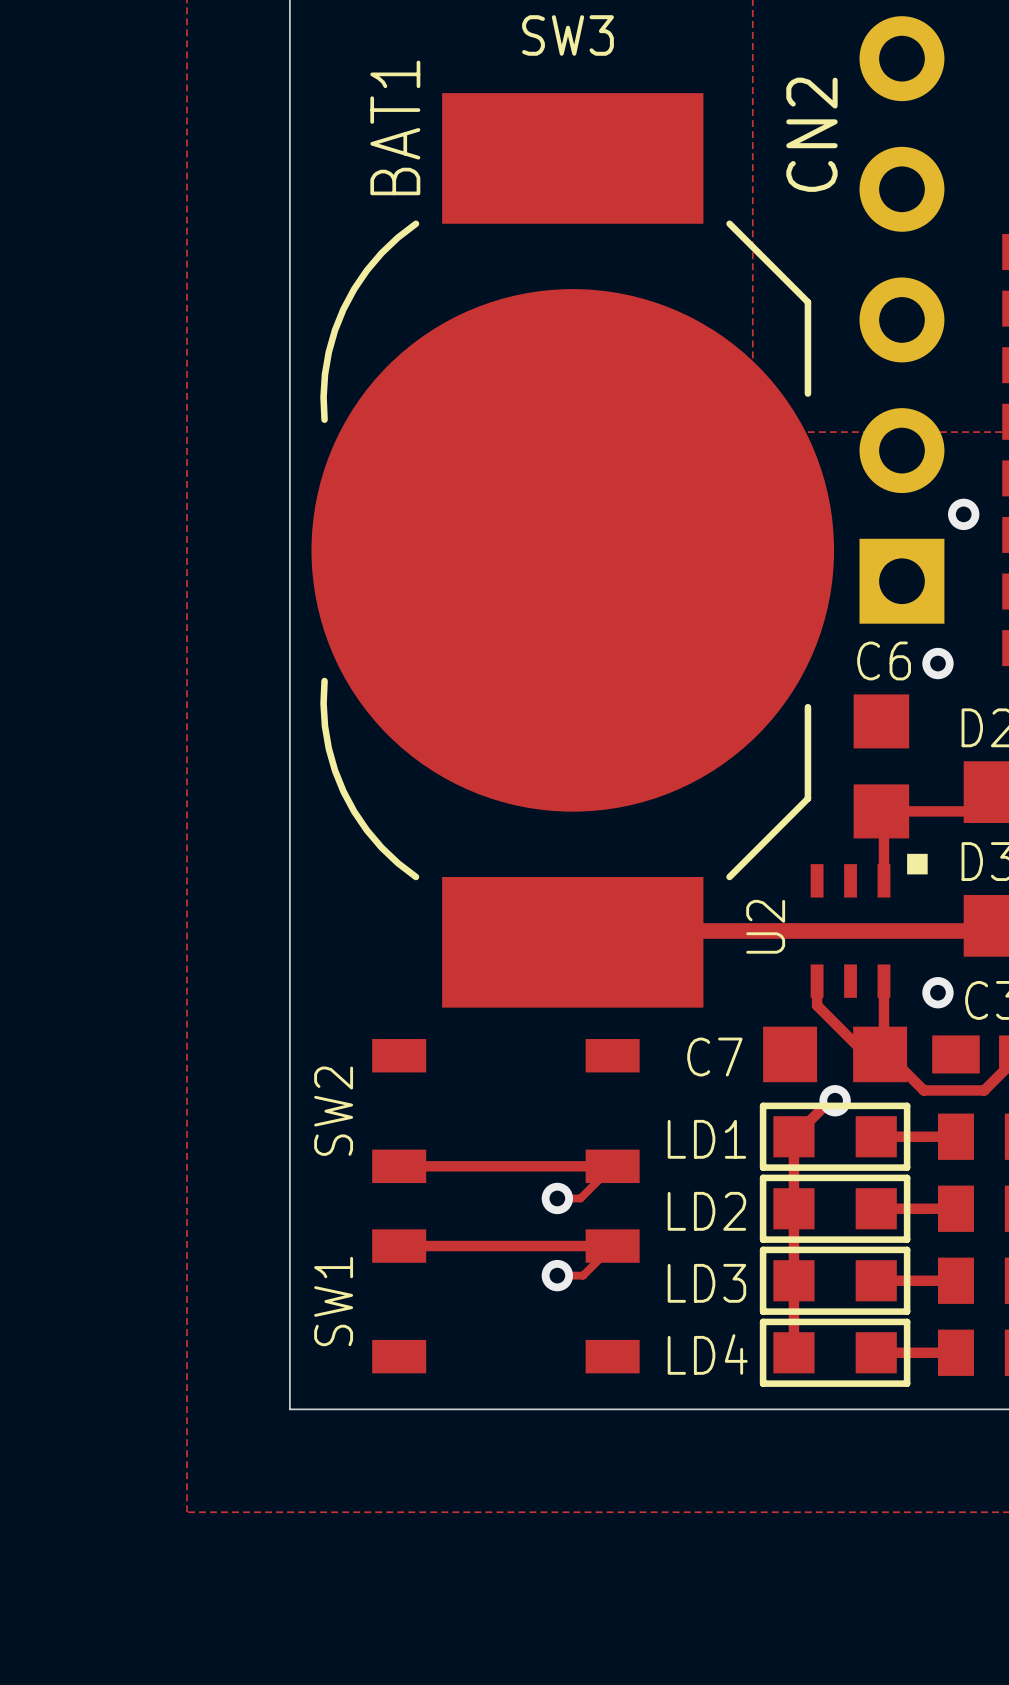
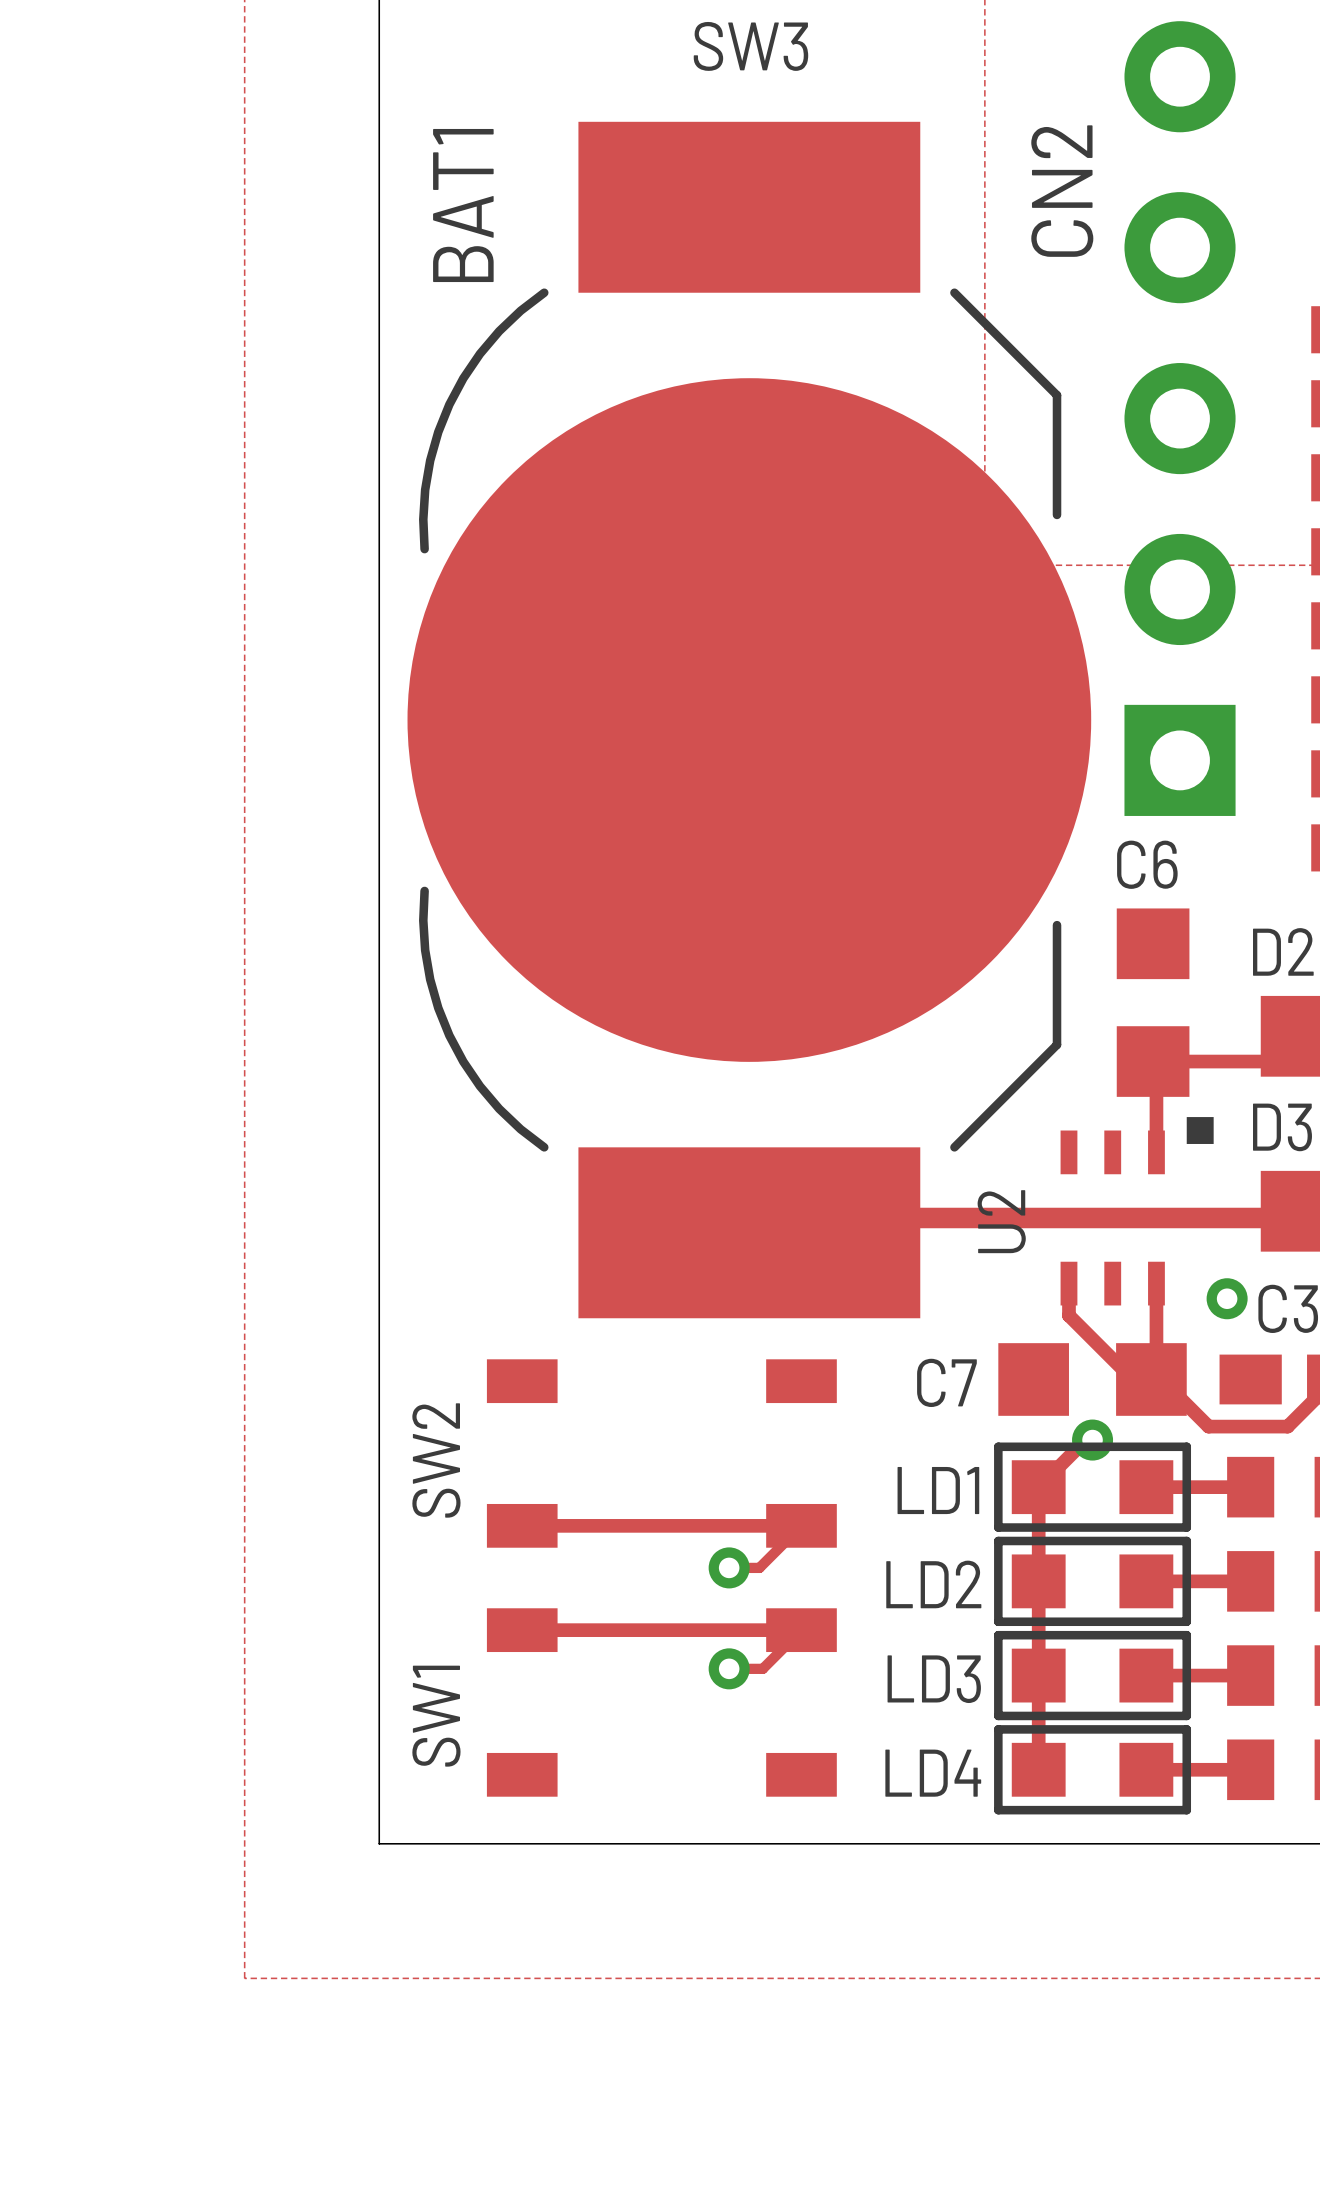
BAT1 name position: BAT1 (395, 127) -> BAT1 (463, 205)
via: (963, 514) -> none
via: (937, 663) -> none

